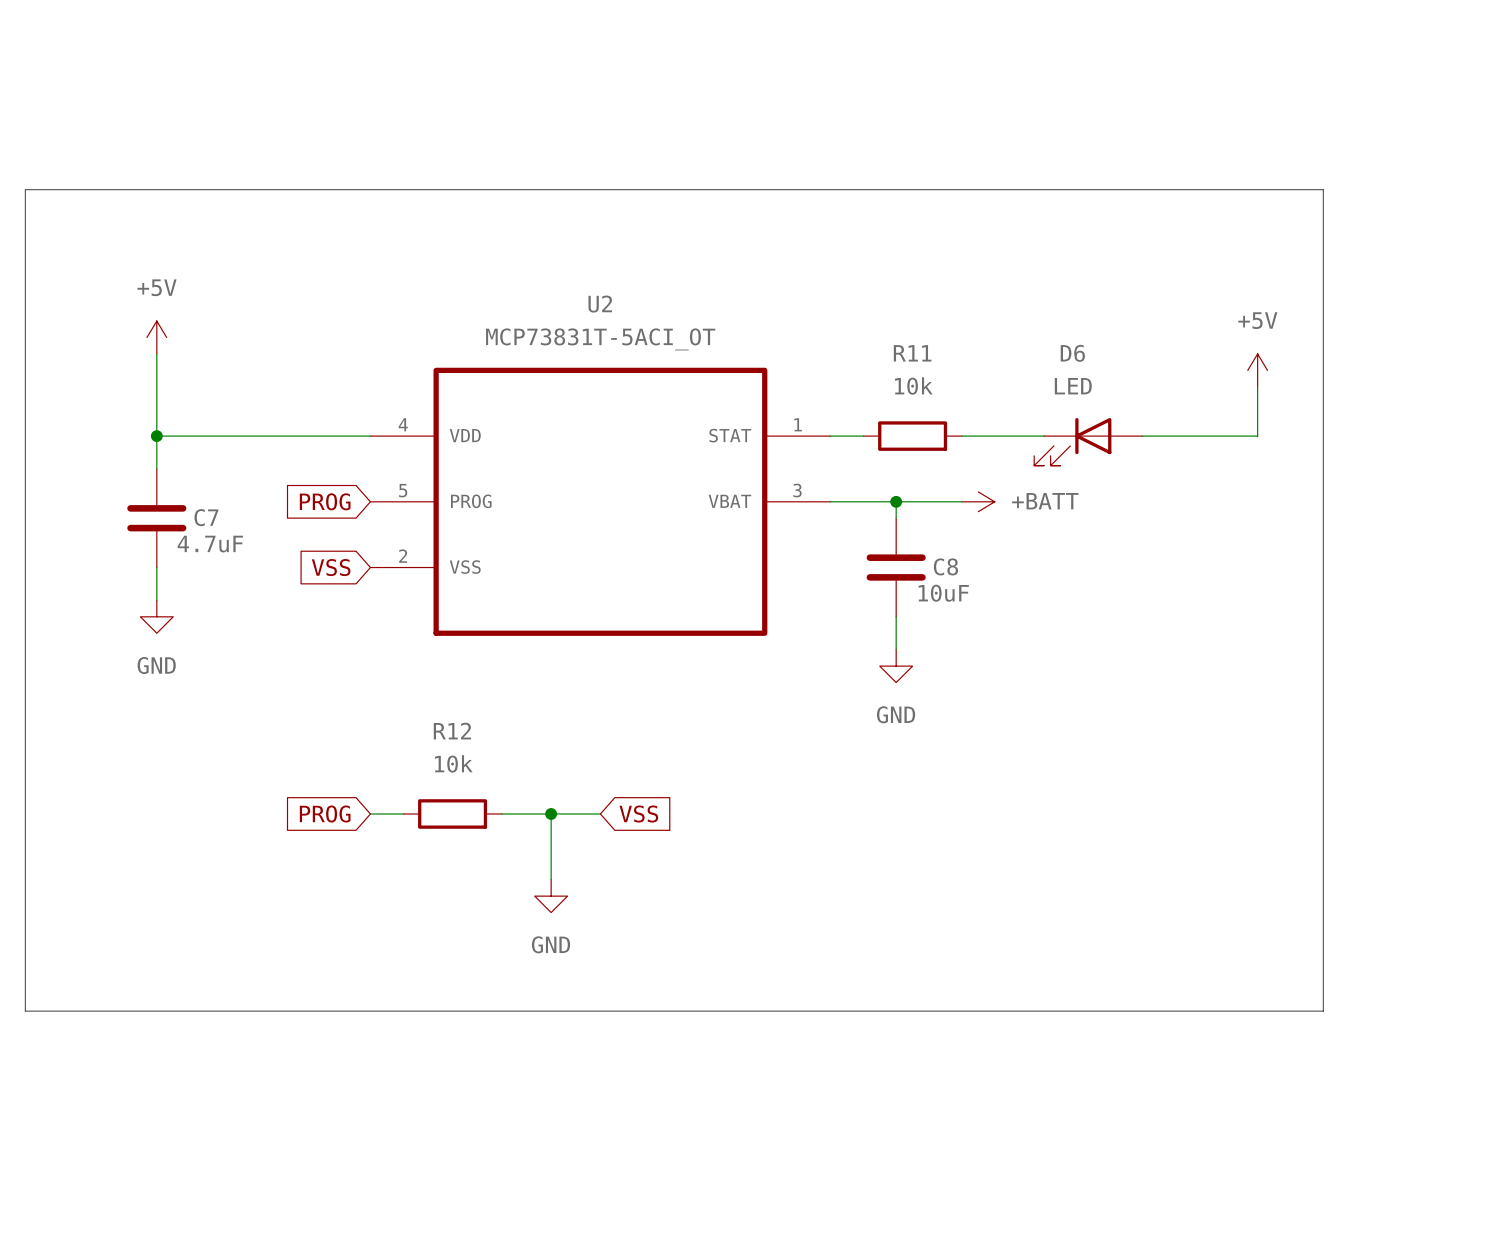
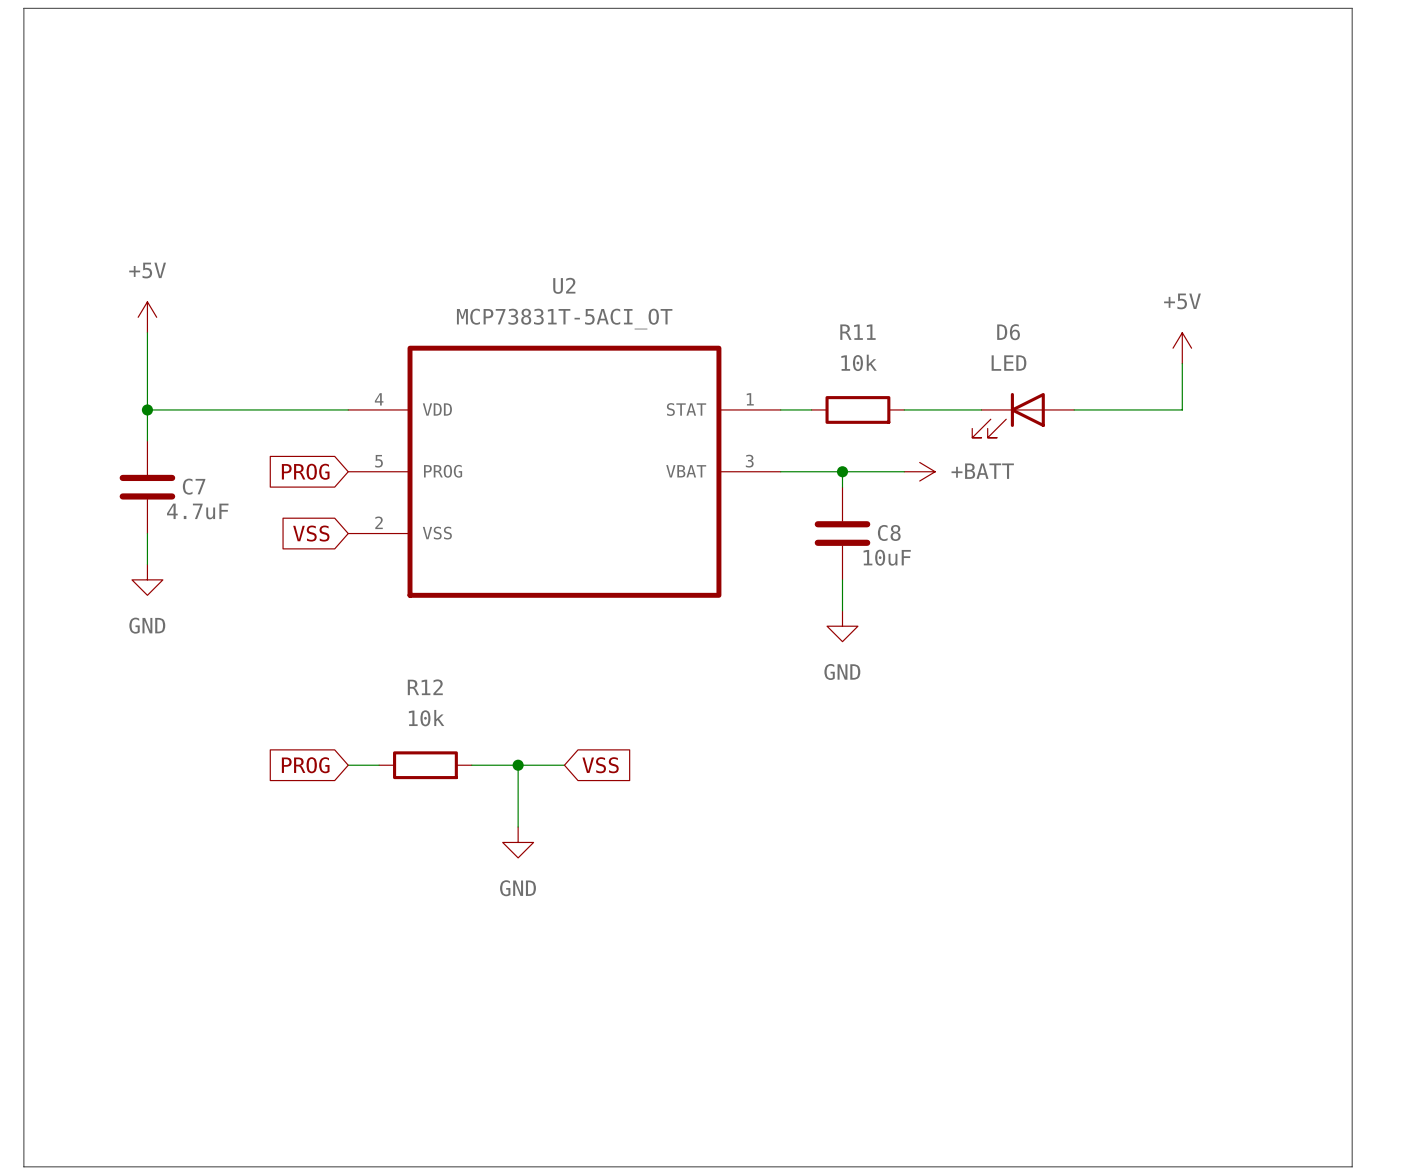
line: (25, 189) (1323, 189) (1323, 1011) (25, 1011) -> (23, 178) (23, 8) (1352, 8) (1352, 1166) (23, 1166) (23, 950)

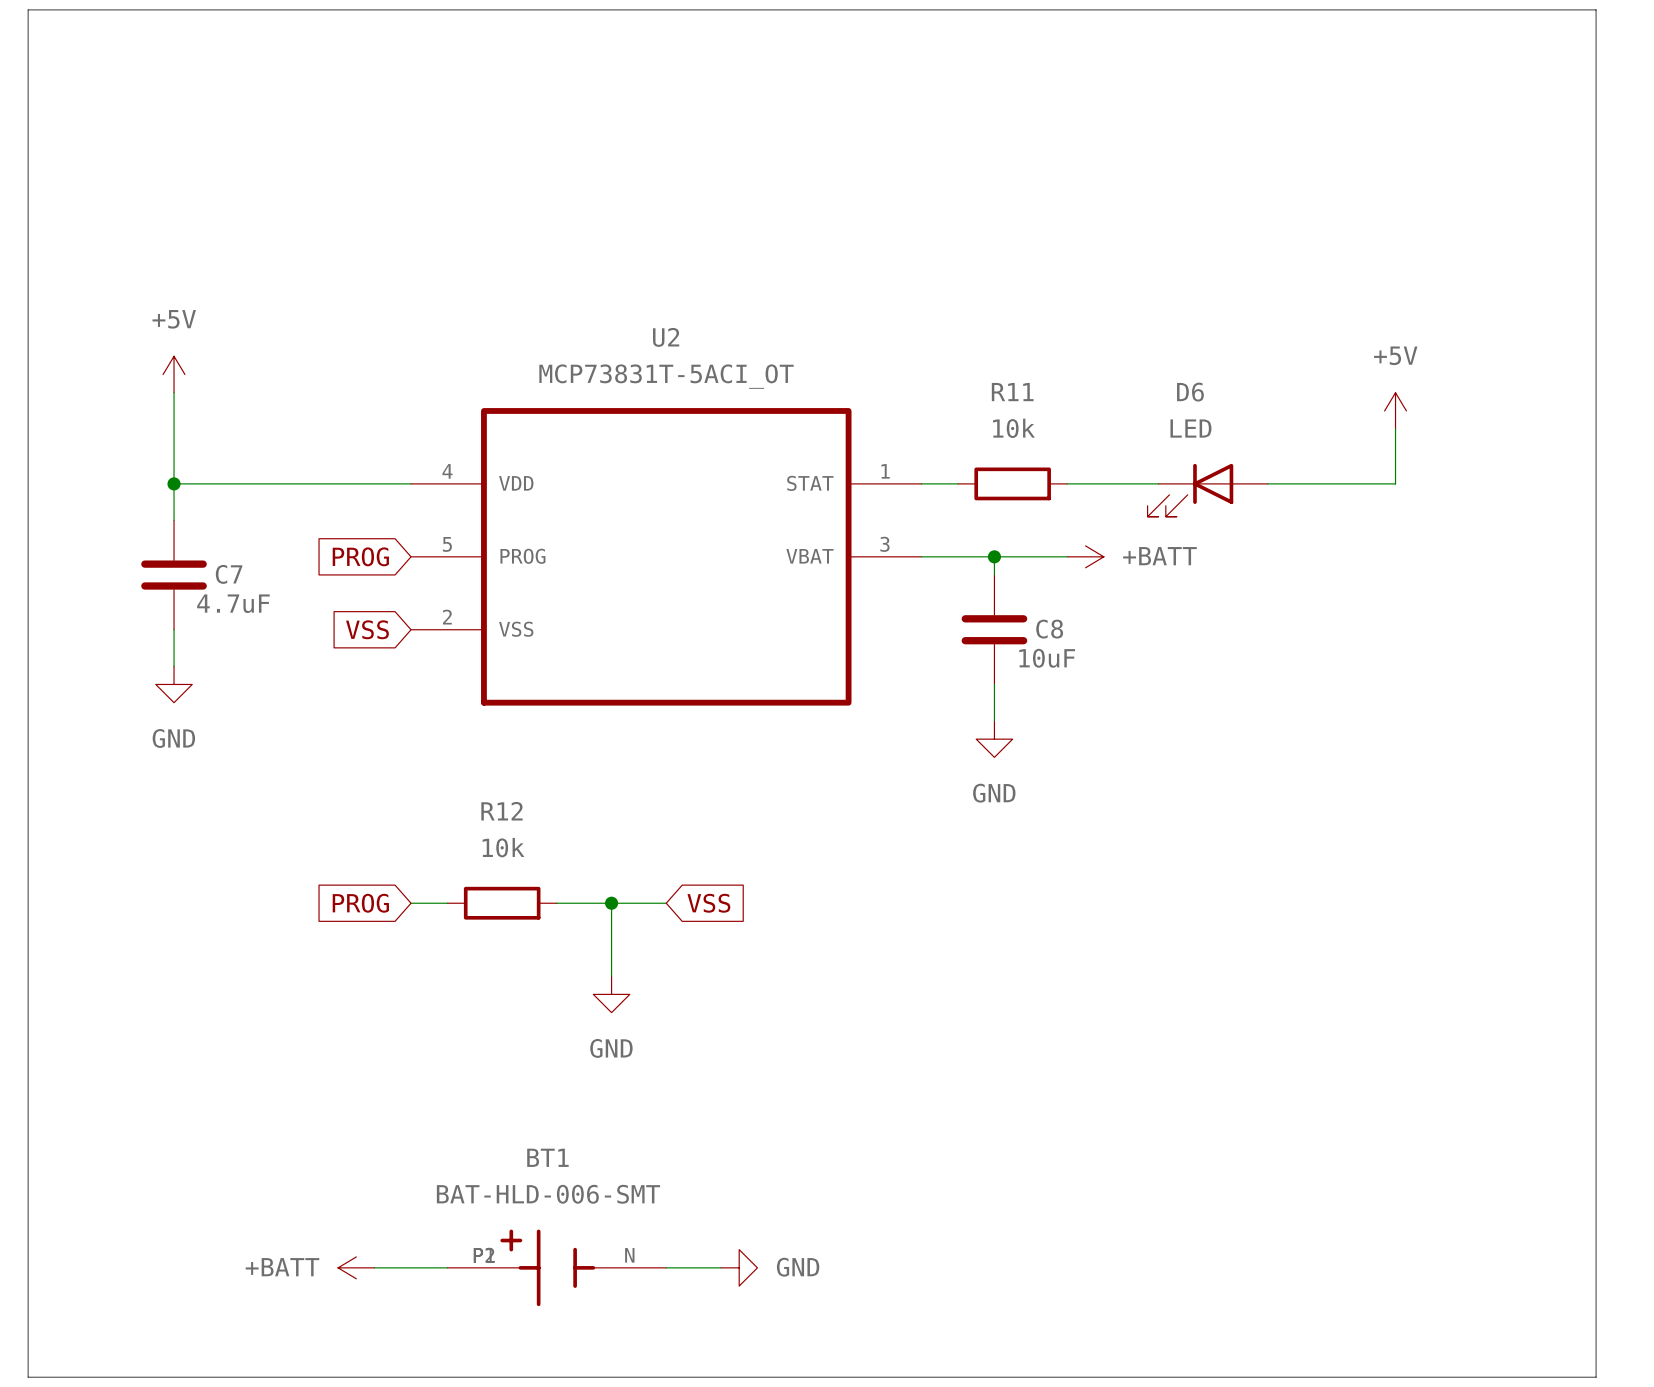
power symbol: none -> +BATT (356, 1267)
wire: none -> (374, 1267) (447, 1267)
BT1: none -> BAT-HLD-006-SMT (556, 1267)
wire: none -> (666, 1267) (720, 1267)
power symbol: none -> GND (739, 1267)

